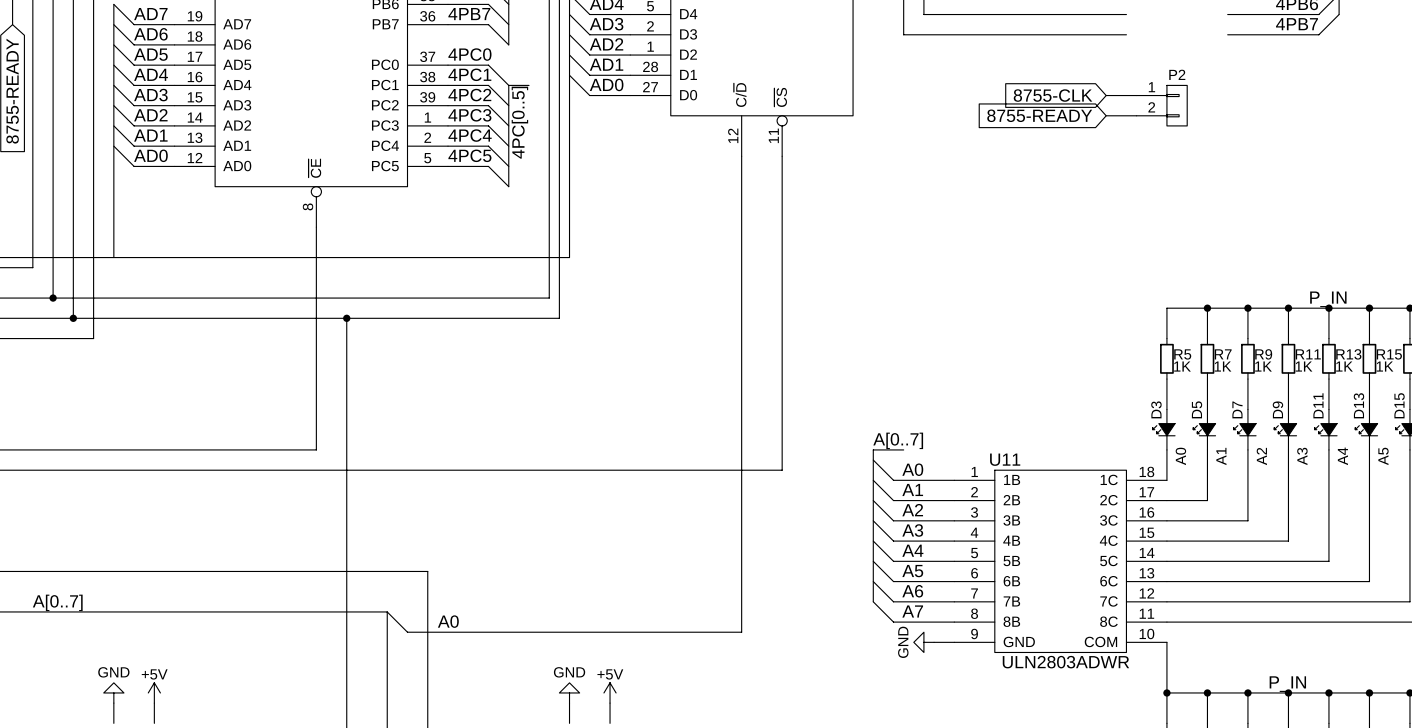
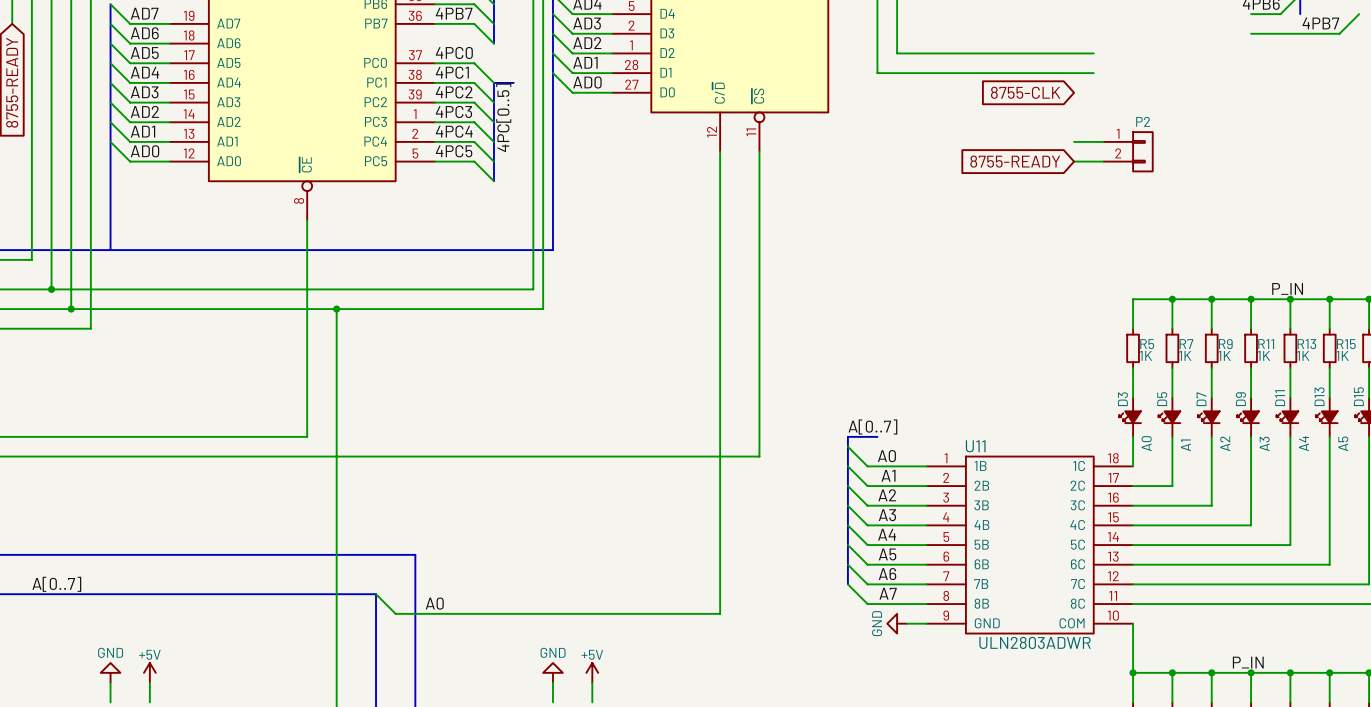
wire: (923, 14) (1126, 14) -> (897, 14) (897, 53) (1093, 53)
wire: (1227, 14) (1288, 14) -> none
wire: (1339, 14) (1318, 34) -> (1359, 14) (1339, 33) (1280, 33)
label position: 4PB7 (1296, 24) -> 4PB7 (1320, 23)
wire: (903, 34) (1126, 34) -> (877, 33) (877, 73) (1093, 73)
wire: (1227, 34) (1288, 34) -> none
wire: (1106, 95) (1136, 95) -> (1074, 141) (1103, 141)
P2 position: (1161, 105) -> (1128, 151)
global label position: 8755-READY (1039, 115) -> 8755-READY (1015, 161)
wire: (1106, 115) (1136, 115) -> (1074, 161) (1103, 161)

